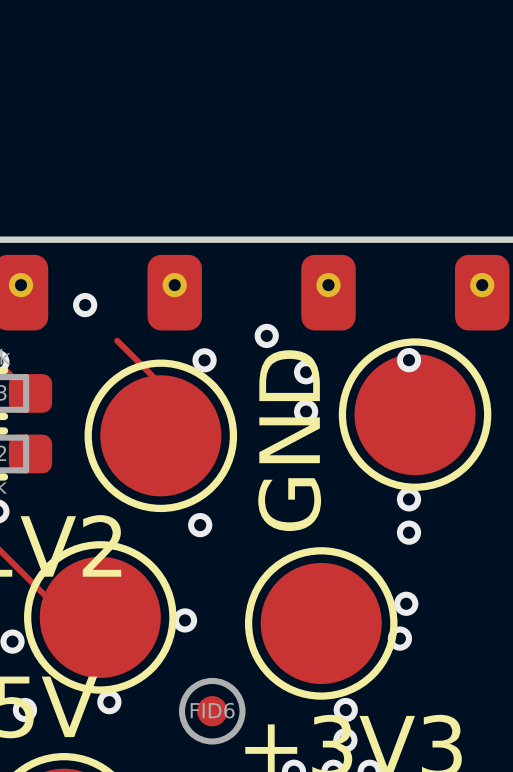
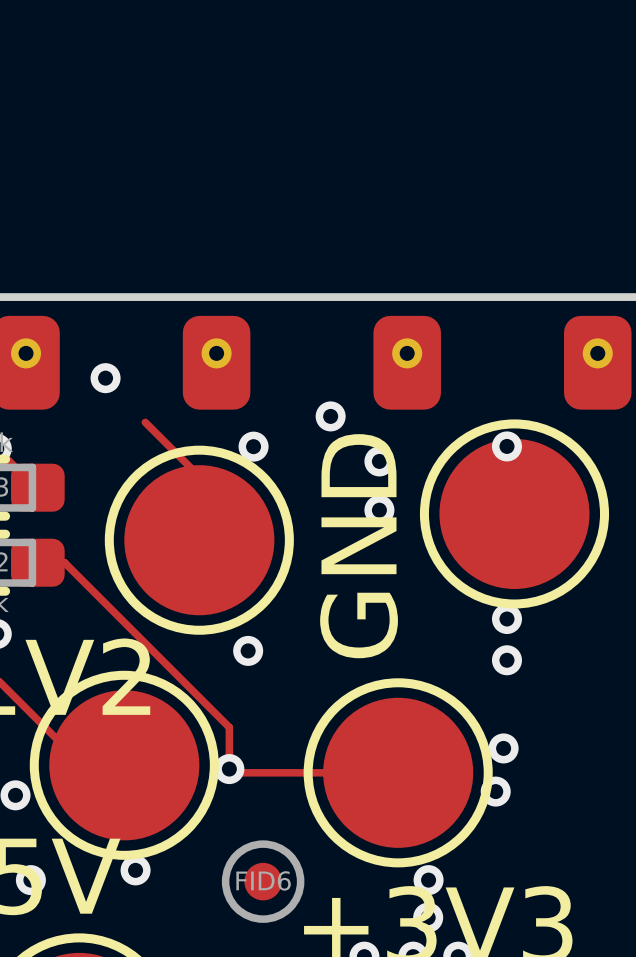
track: none -> (37, 562) (64, 562) (229, 727) (229, 769) (233, 772) (398, 772)

